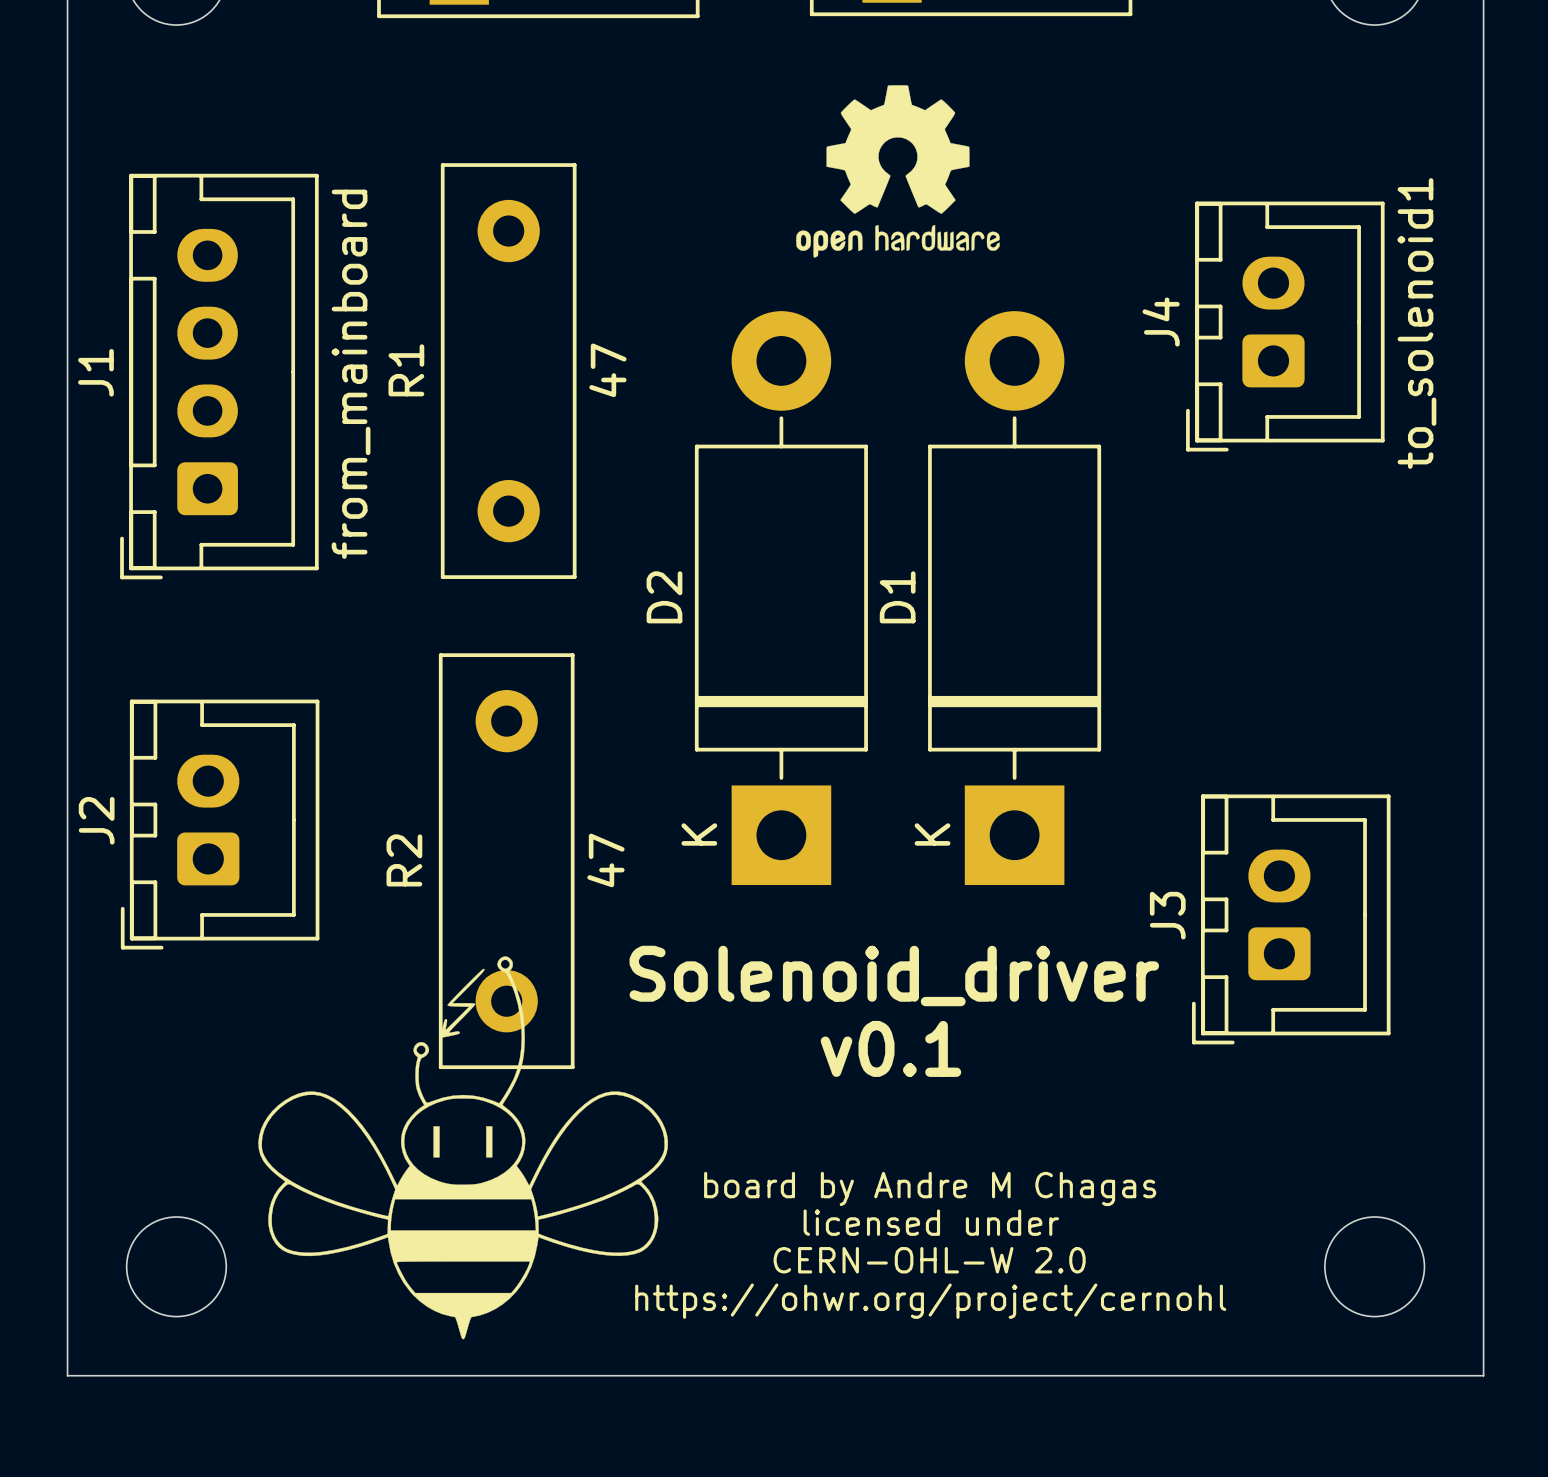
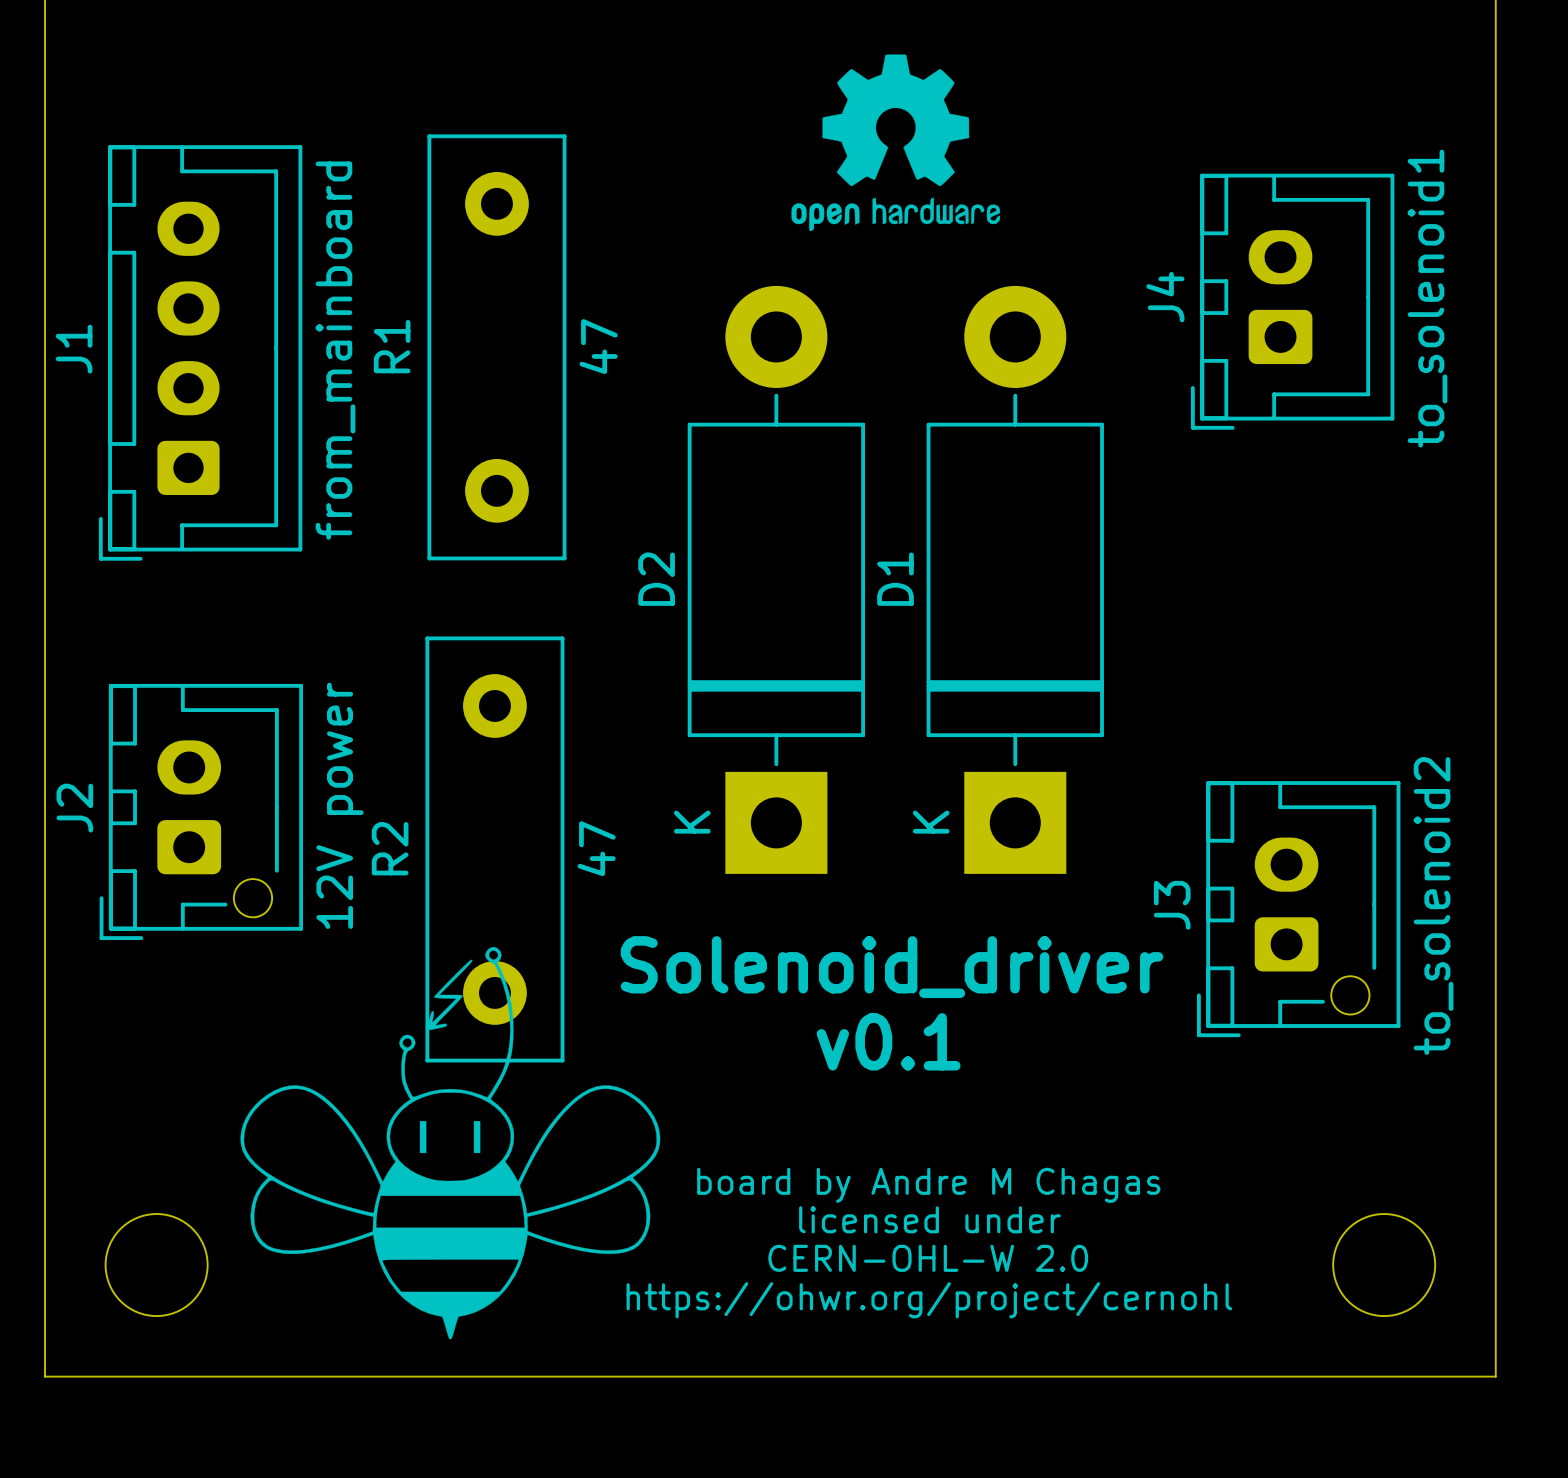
J2 footprint: [120, 699, 320, 950] -> [99, 683, 304, 940]
J3 footprint: [1191, 794, 1391, 1045] -> [1197, 781, 1401, 1038]
J2 value: none -> 12V power (340, 805)
J3 value: none -> to_solenoid2 (1433, 906)

